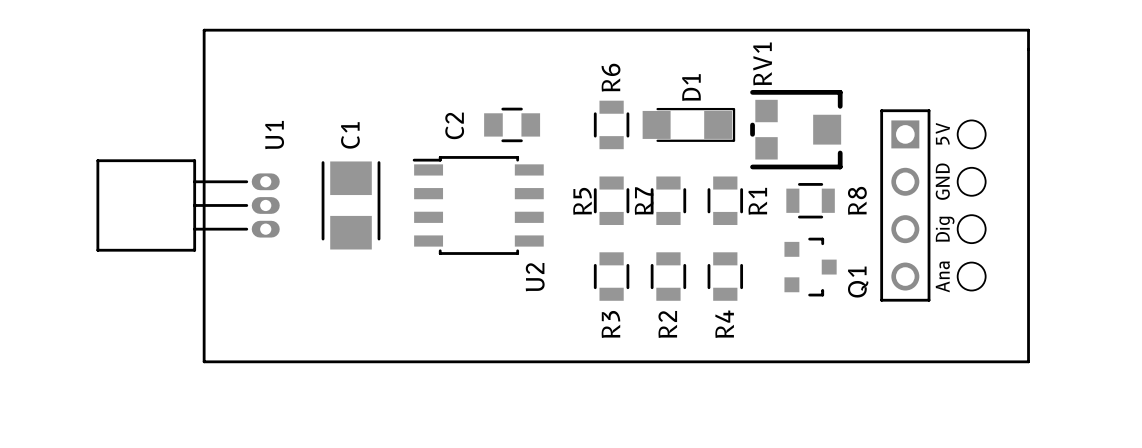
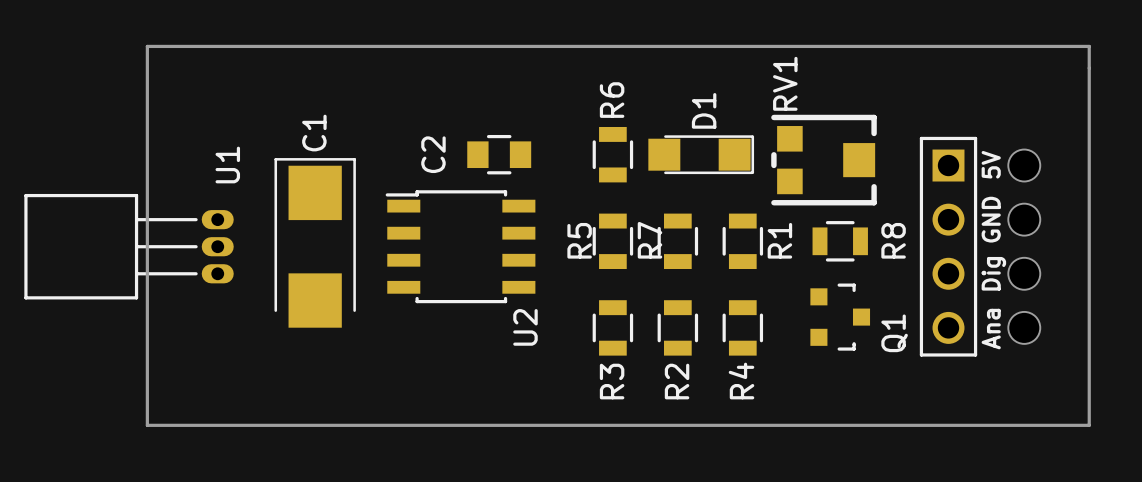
C1 footprint: [321, 161, 381, 250] -> [274, 158, 356, 328]

